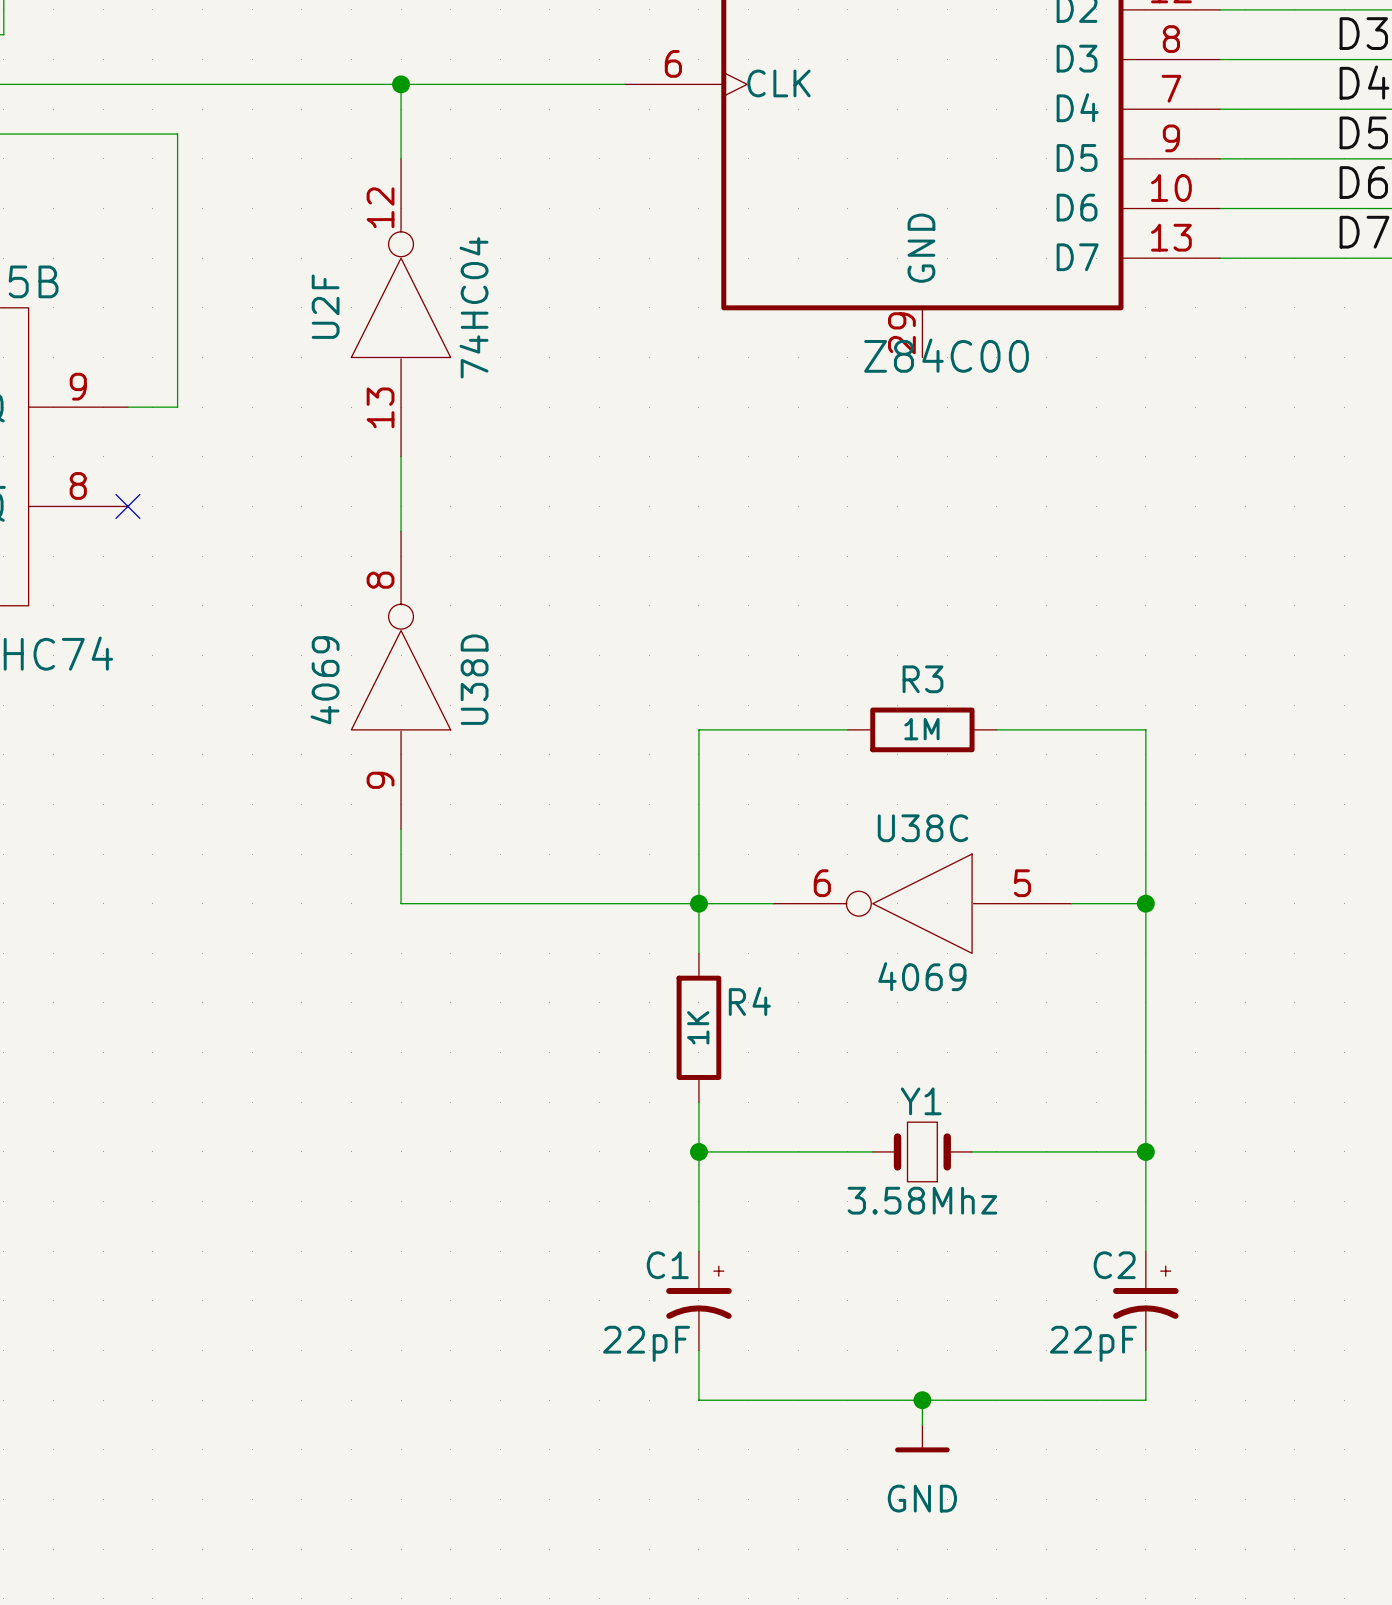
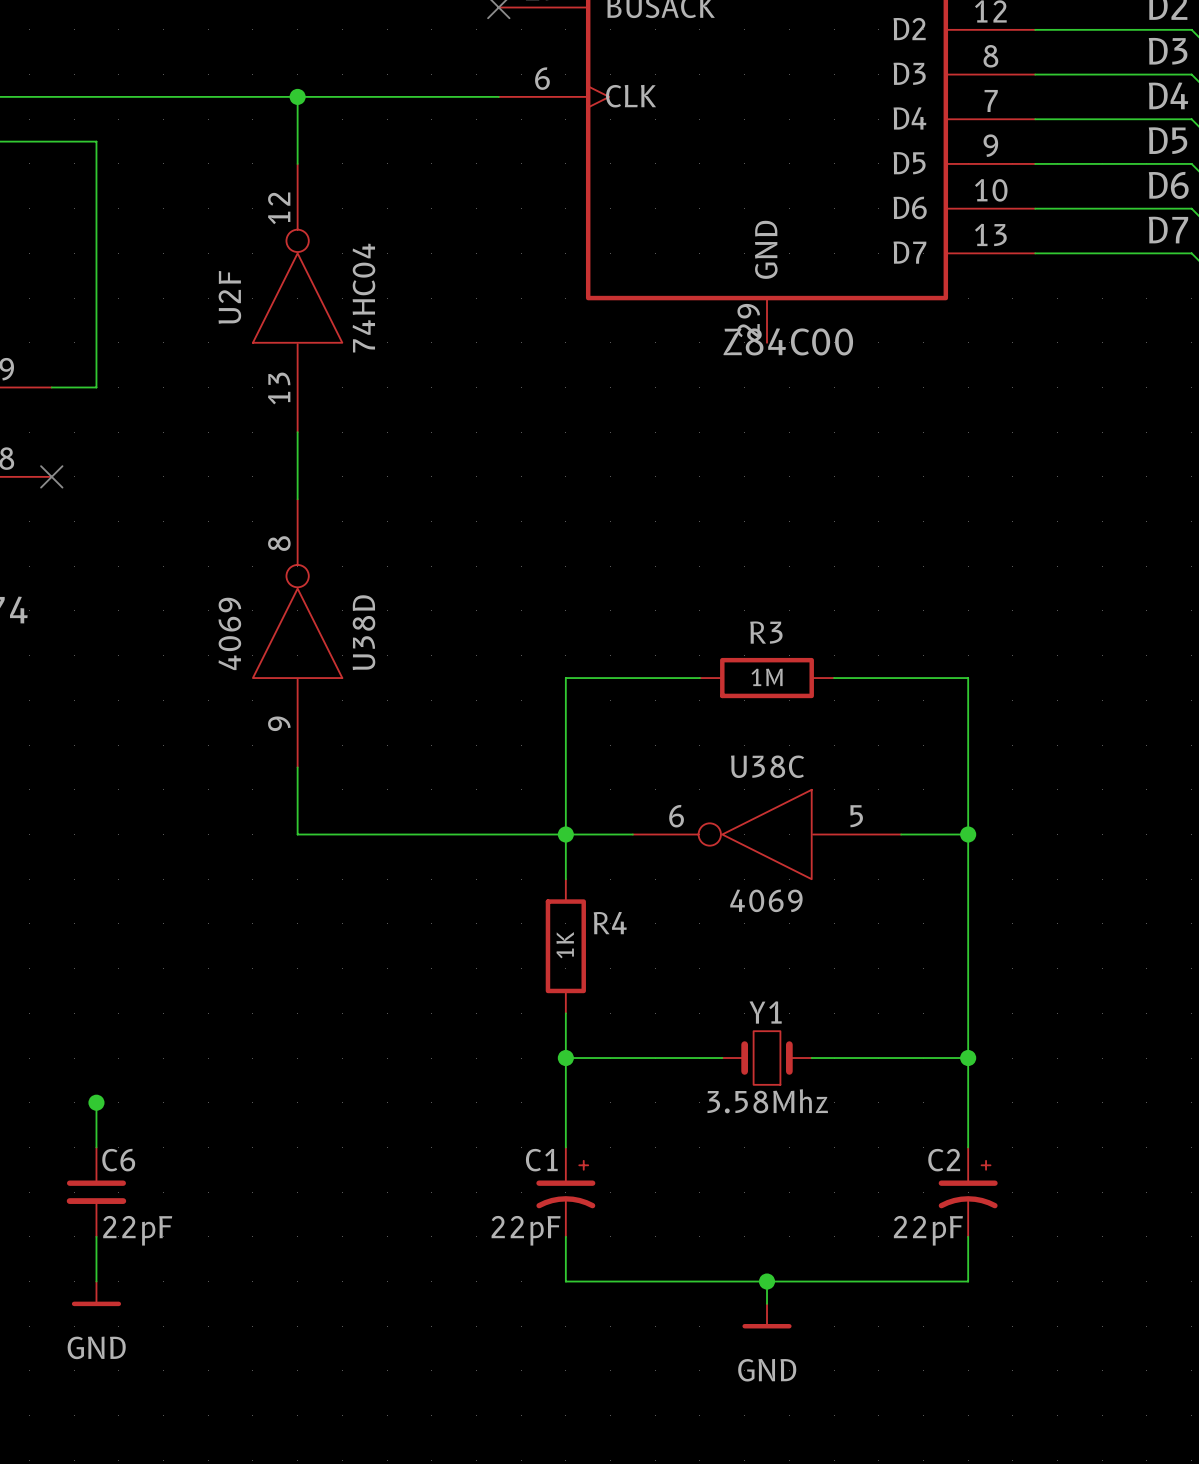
wire: none -> (96, 1102) (96, 1147)
junction: none -> (96, 1102)
C6: none -> 22pF (96, 1192)
wire: none -> (96, 1236) (96, 1281)
power symbol: none -> GND (96, 1293)

